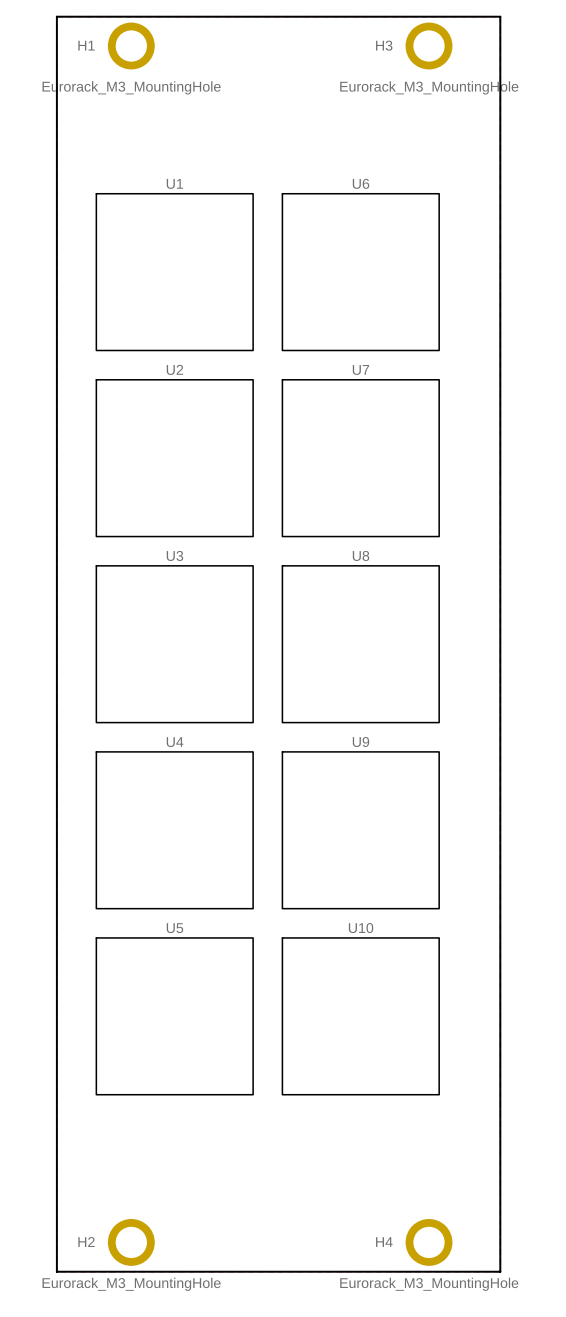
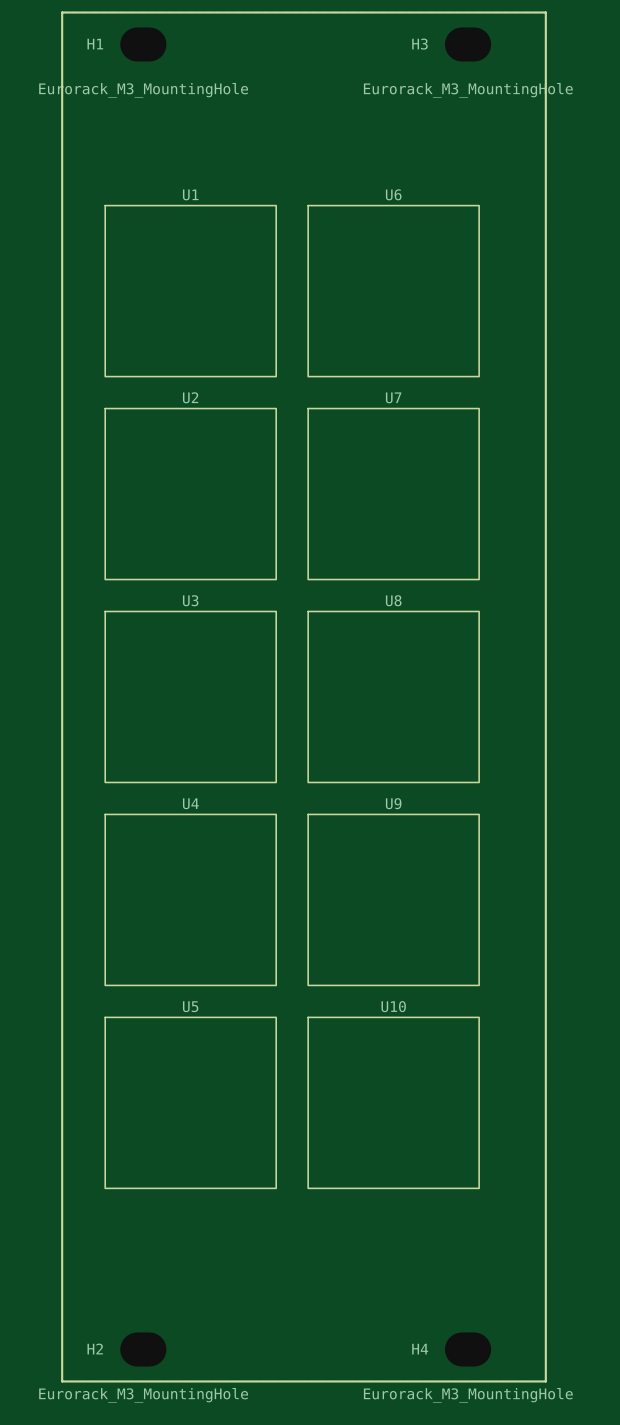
H1 footprint: [107, 22, 155, 70] -> [120, 27, 167, 62]
H3 footprint: [405, 22, 453, 70] -> [444, 27, 492, 62]
H2 footprint: [107, 1218, 155, 1266] -> [120, 1332, 167, 1367]
H4 footprint: [405, 1218, 453, 1266] -> [444, 1332, 492, 1367]

